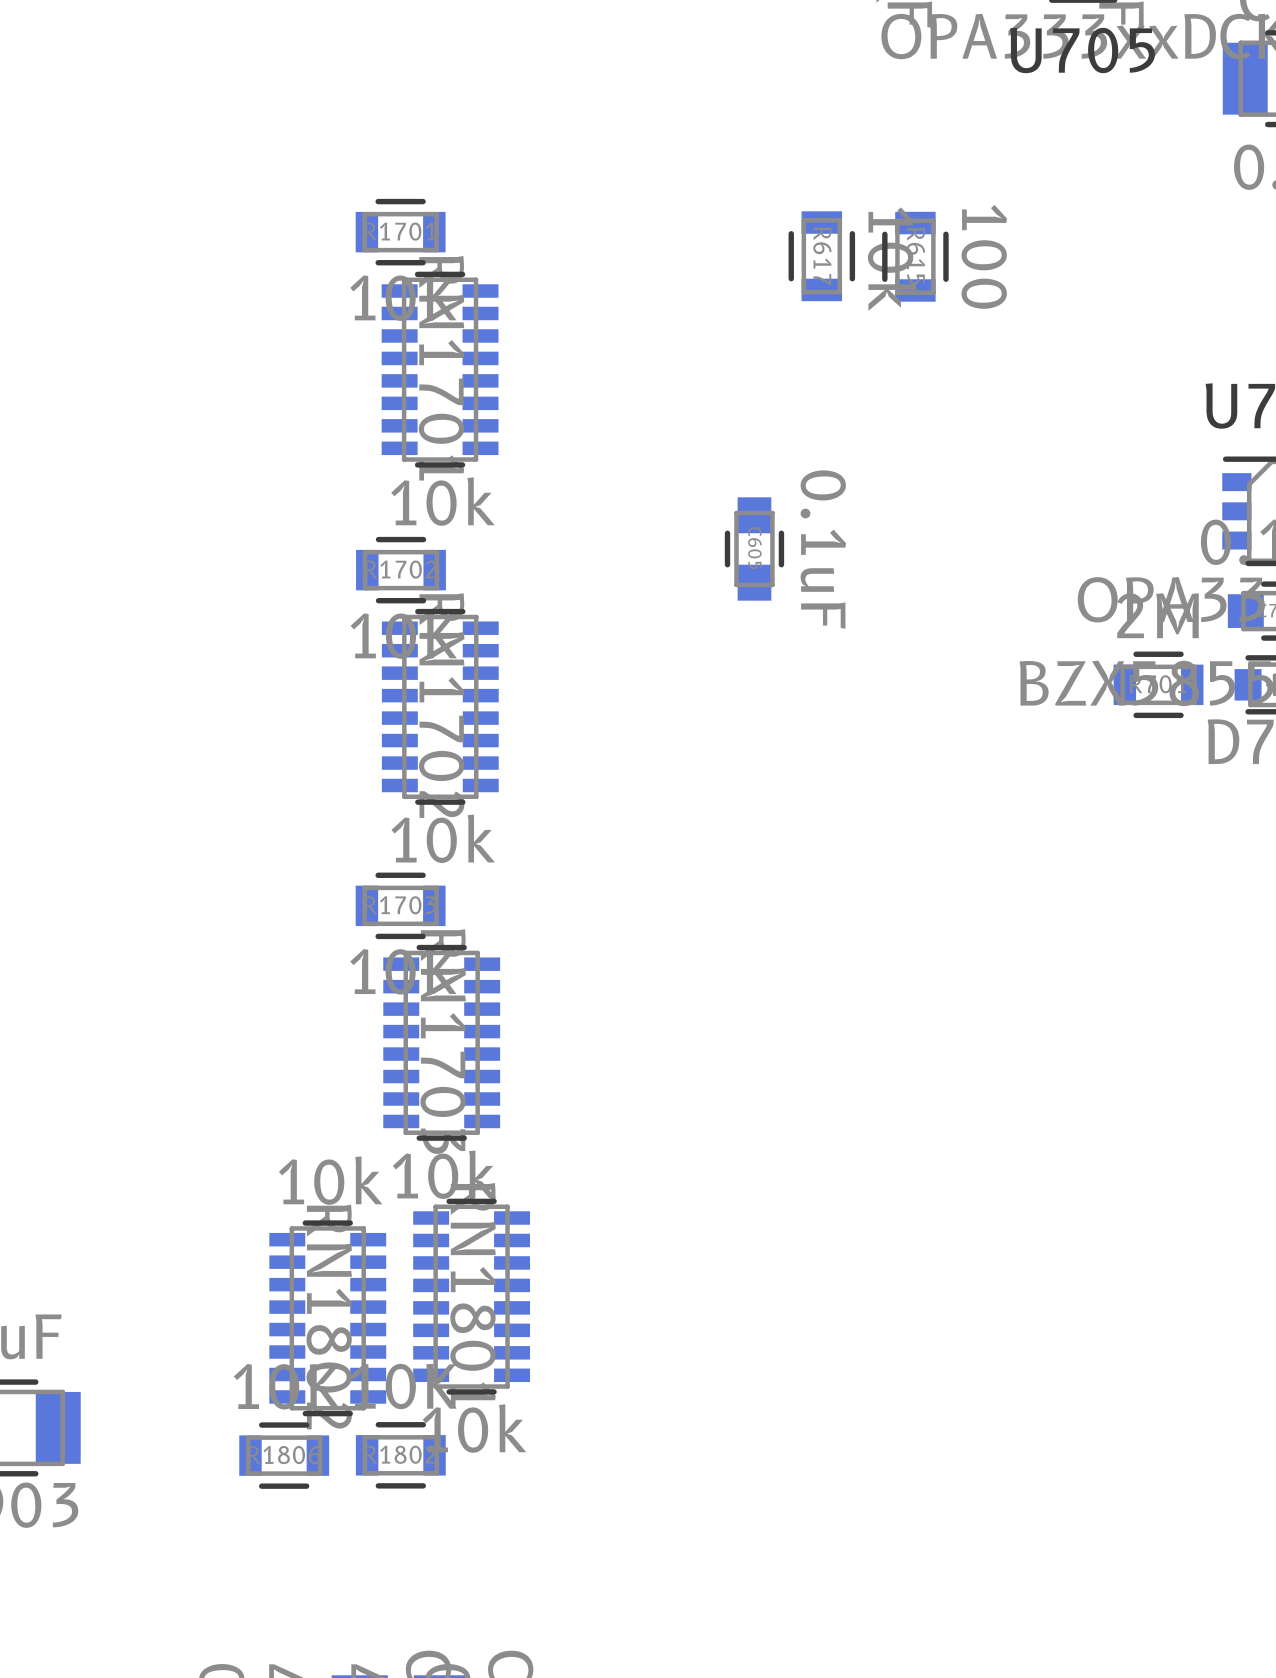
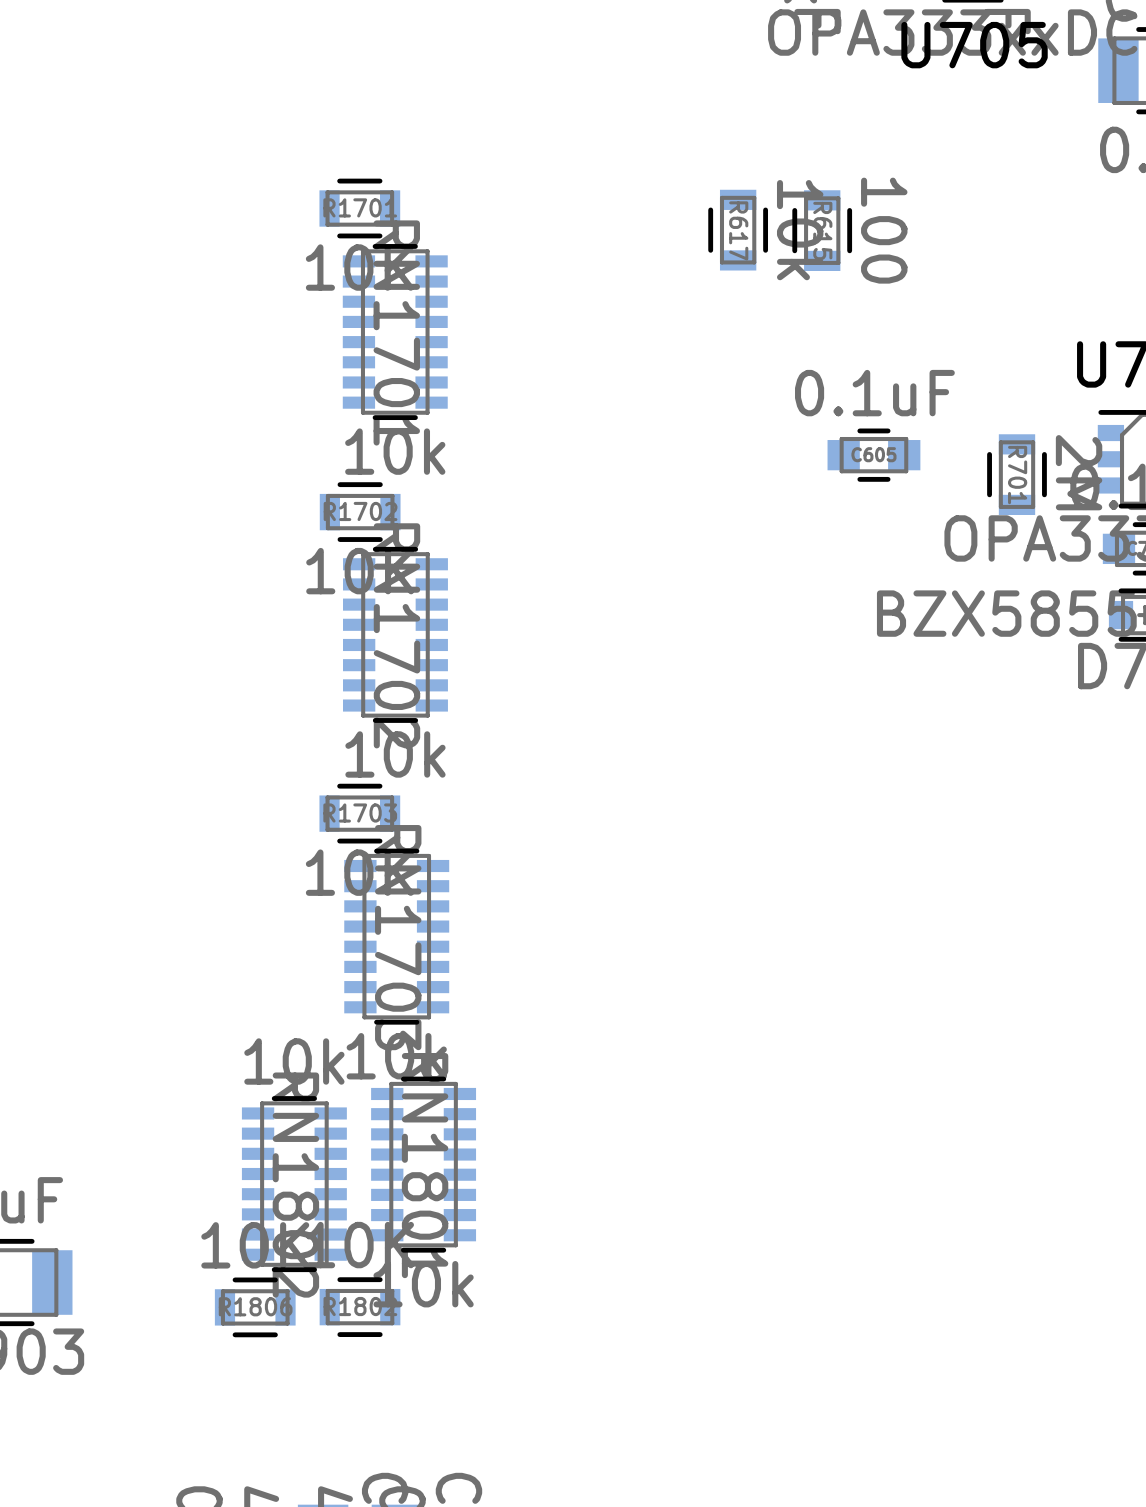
C605 rotation: 0° (754, 548) -> 90° clockwise (873, 455)
C605 position: (754, 548) -> (873, 455)
C605 value position: 0.1uF (823, 549) -> 0.1uF (874, 393)
R701 rotation: 0° (1158, 684) -> 90° clockwise (1017, 474)
R701 position: (1158, 684) -> (1017, 474)

